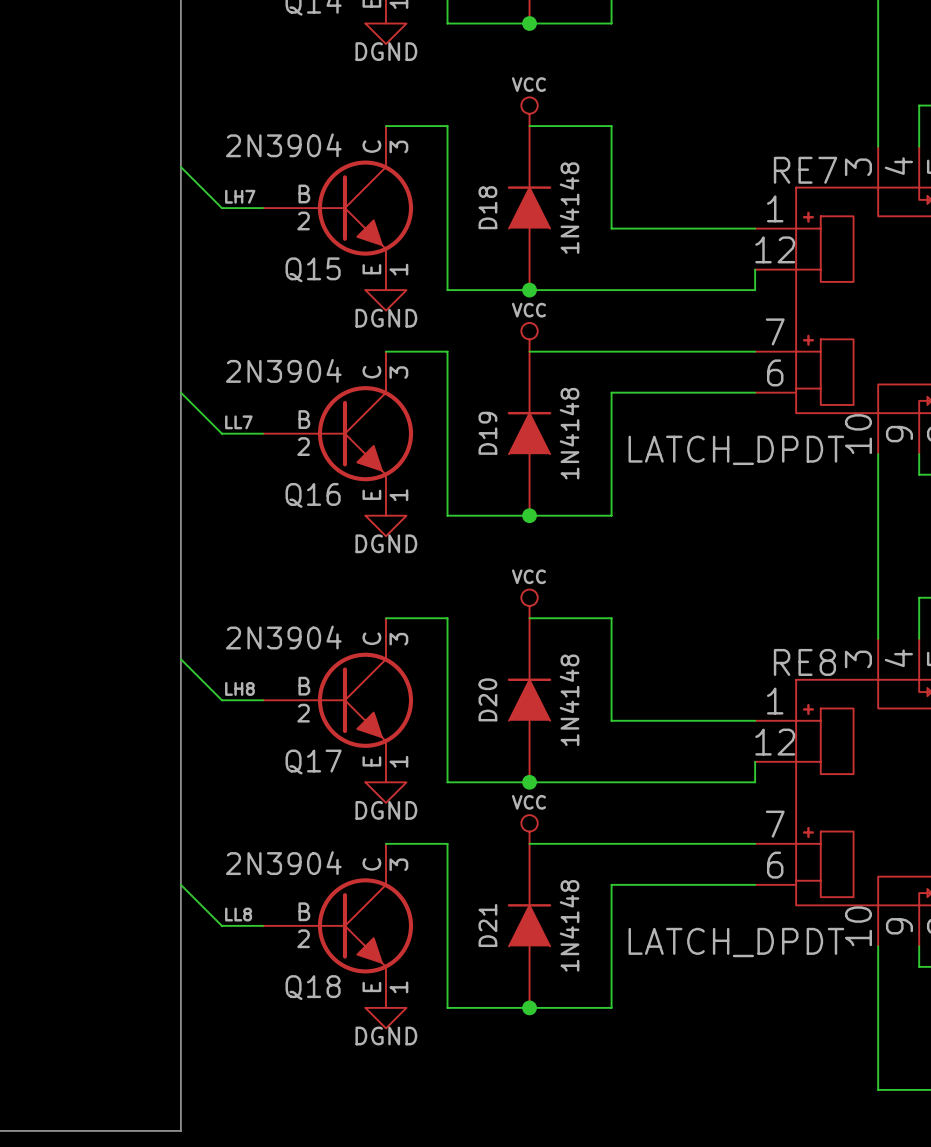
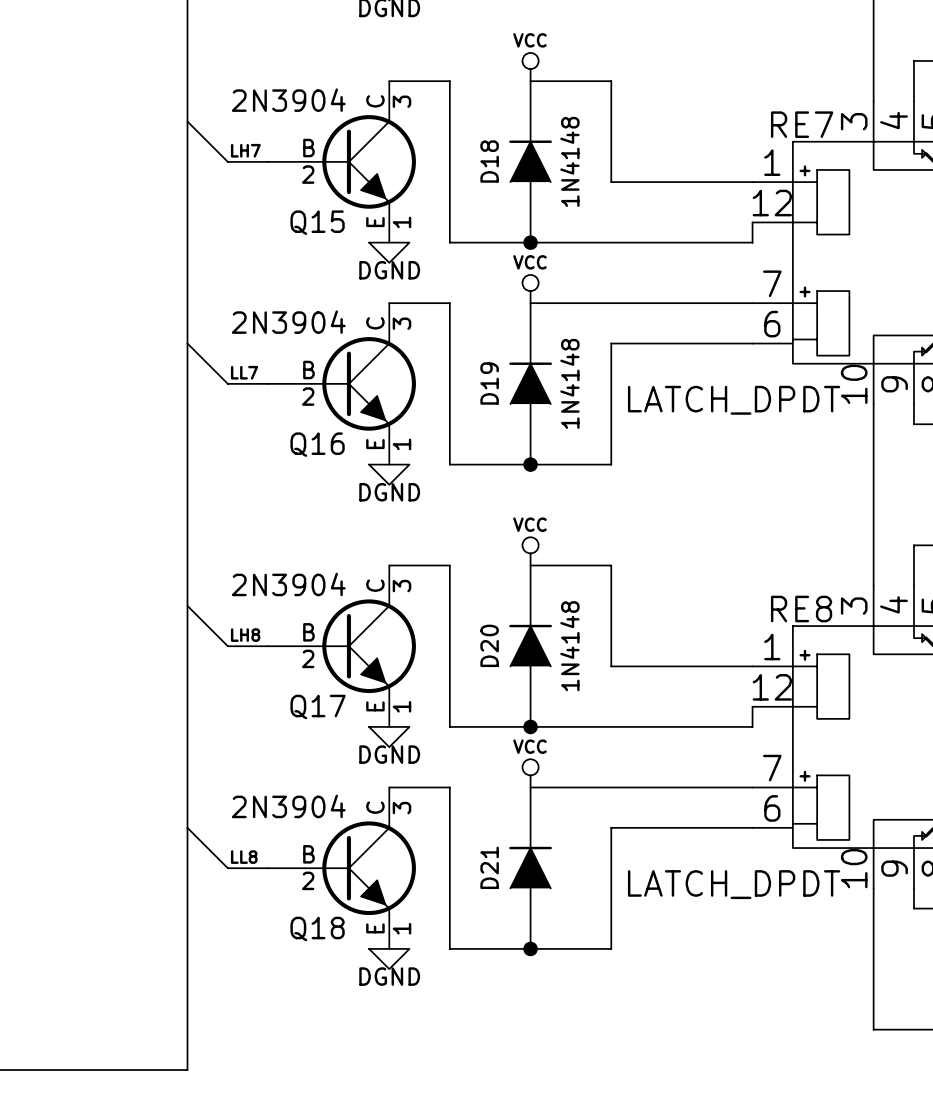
D21 value: 1N4148 (569, 925) -> none

